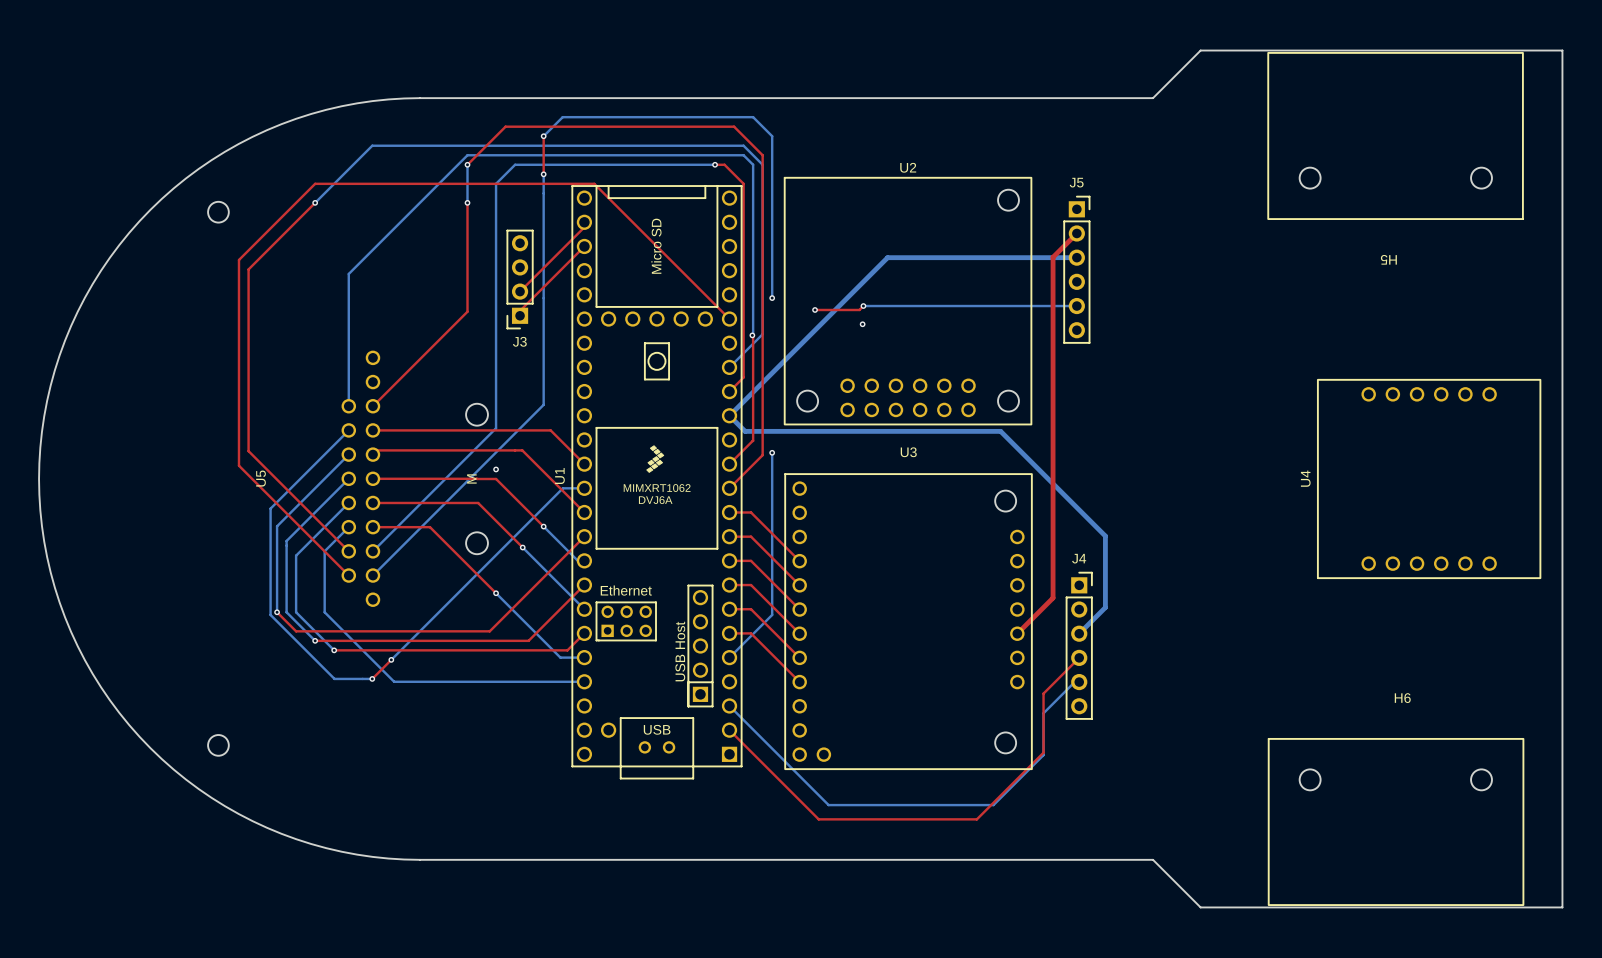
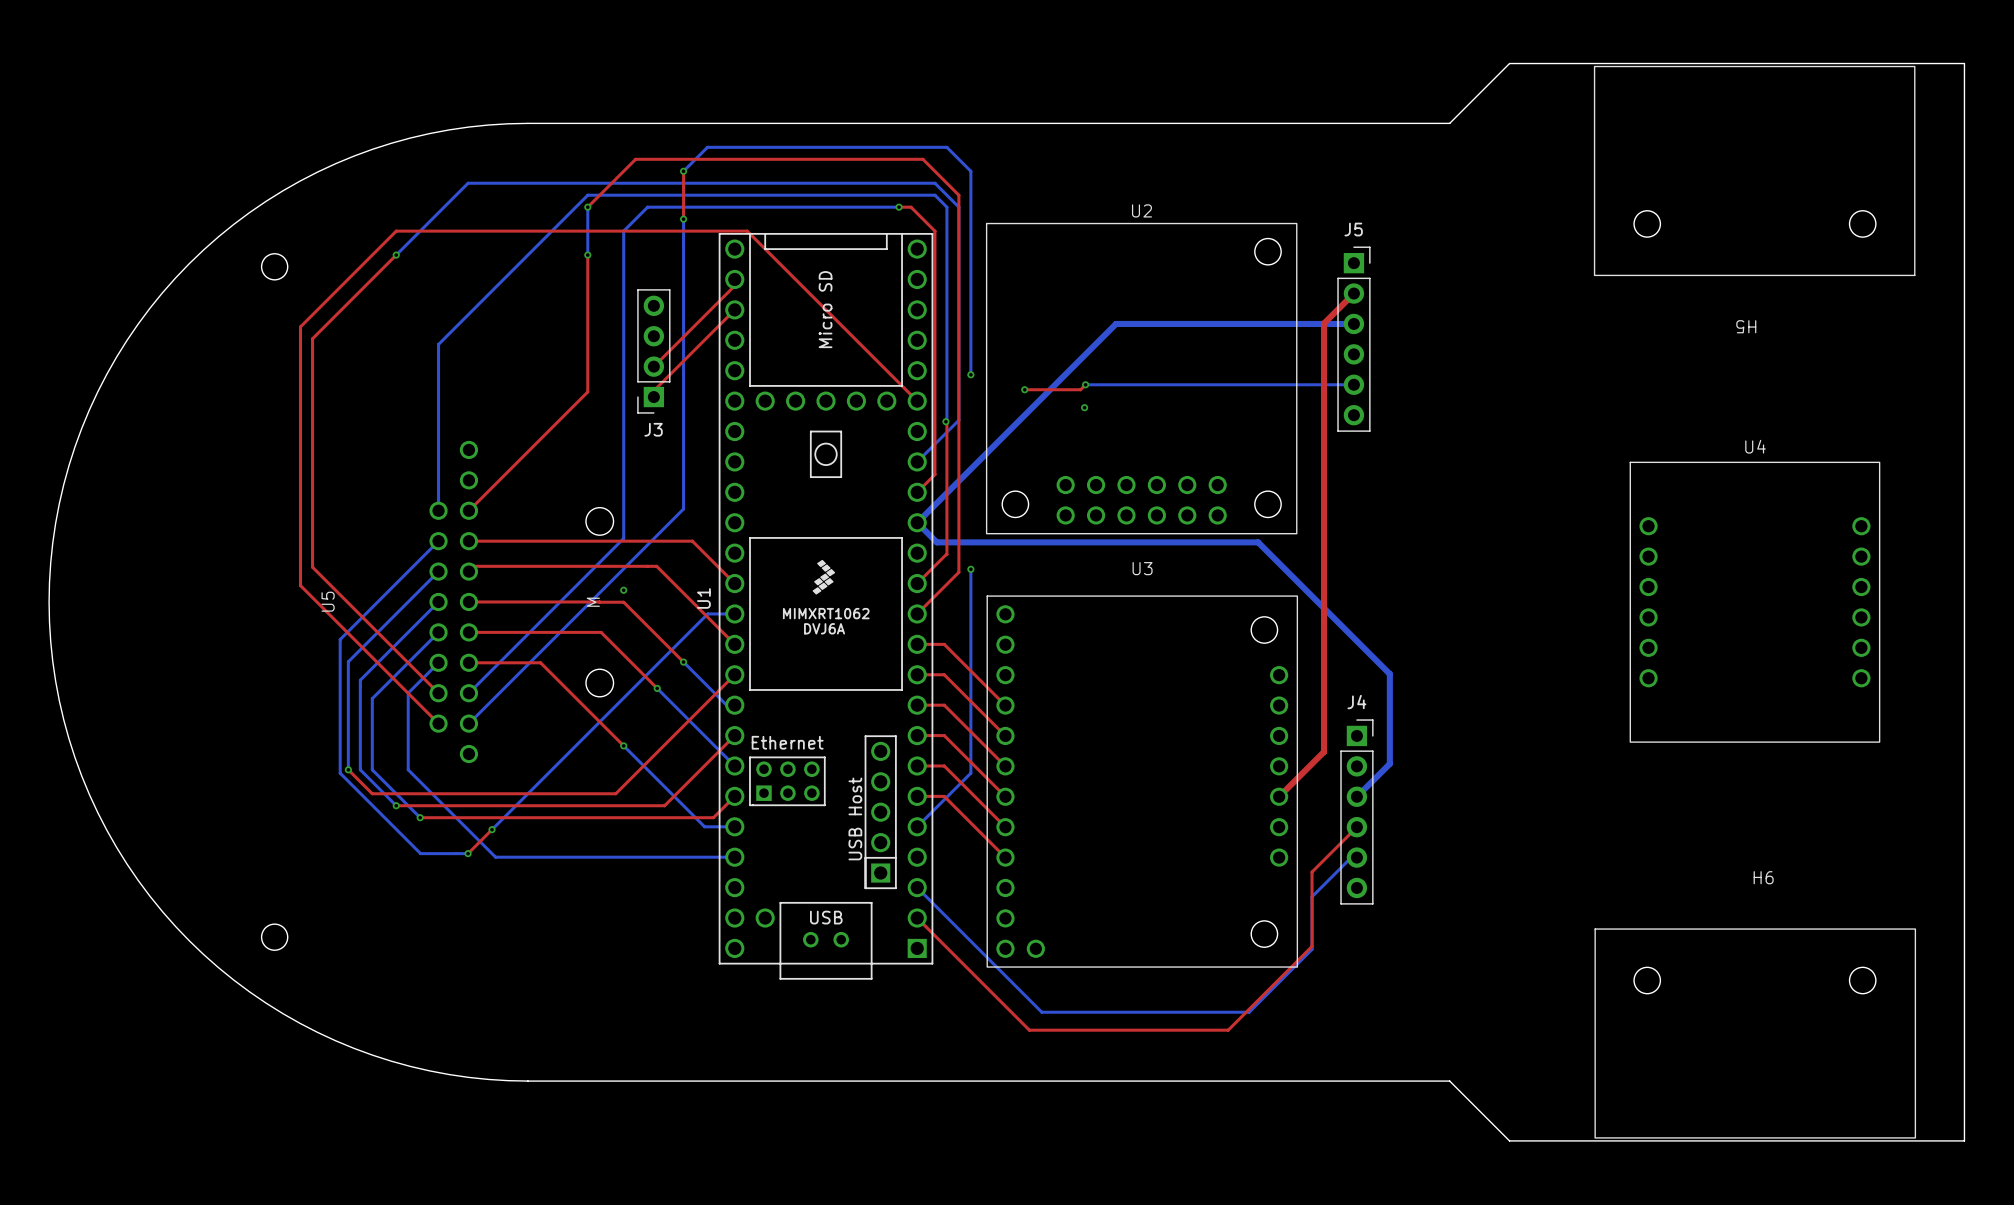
U4 rotation: 0° (1429, 478) -> 90° clockwise (1754, 602)

